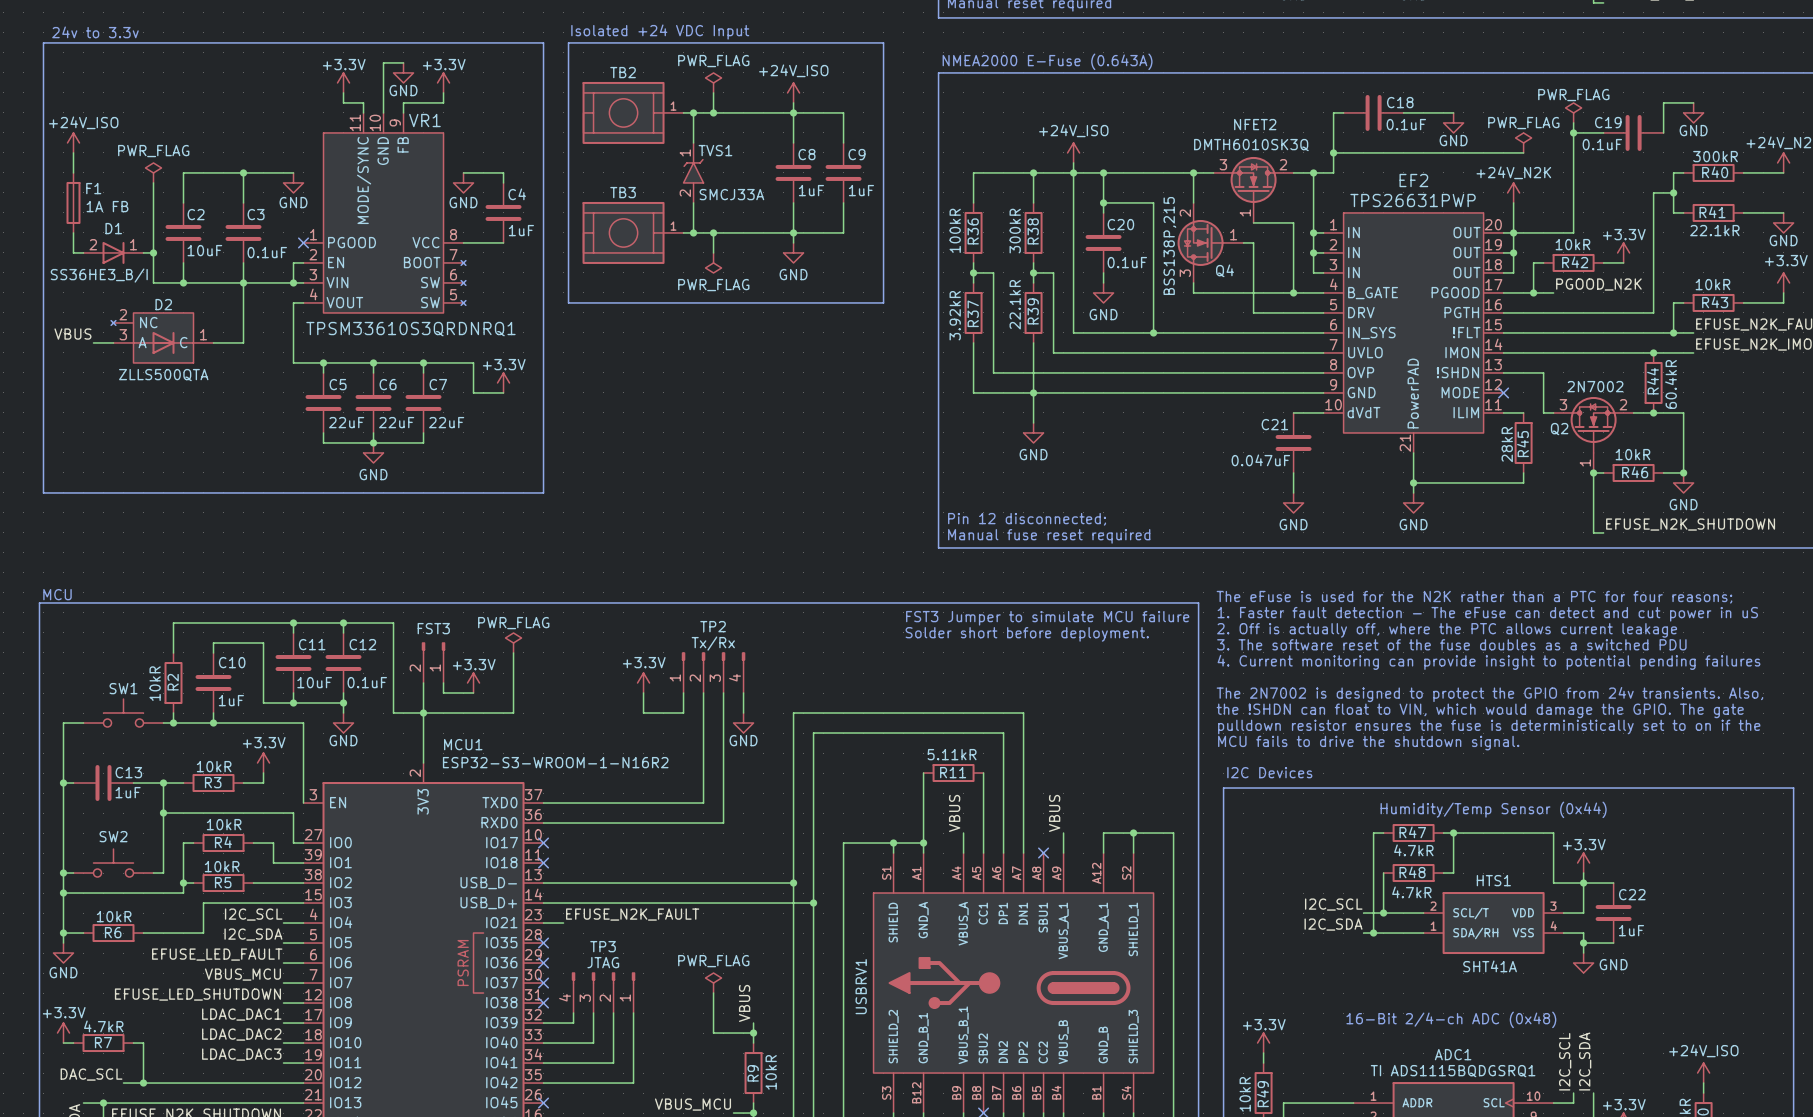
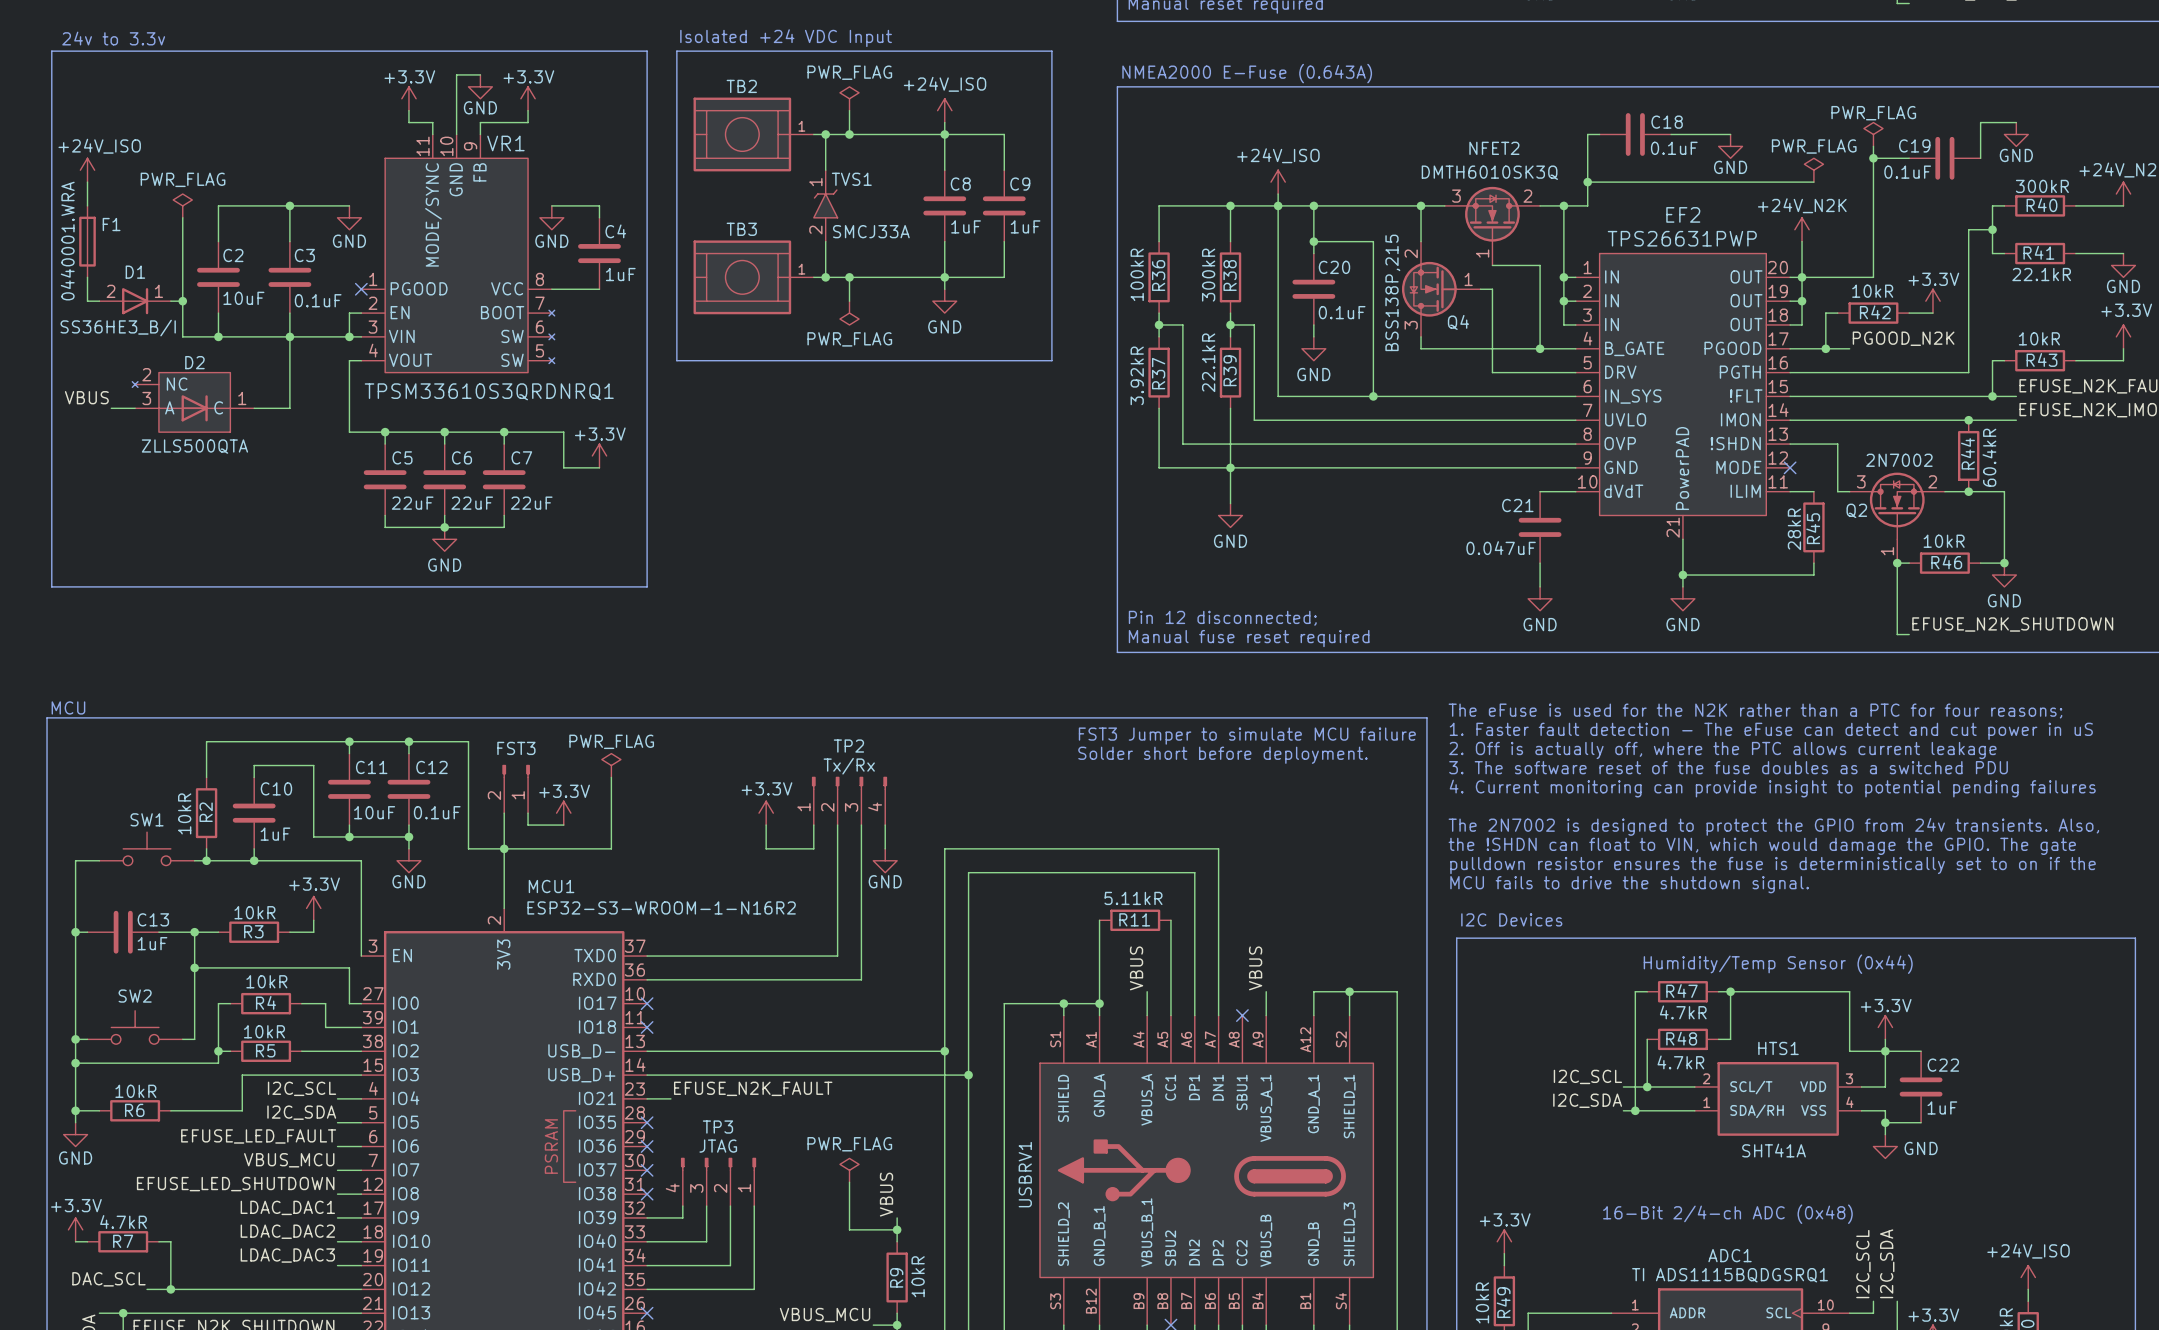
F1 value: 1A FB (107, 206) -> 0440001.WRA (67, 241)

